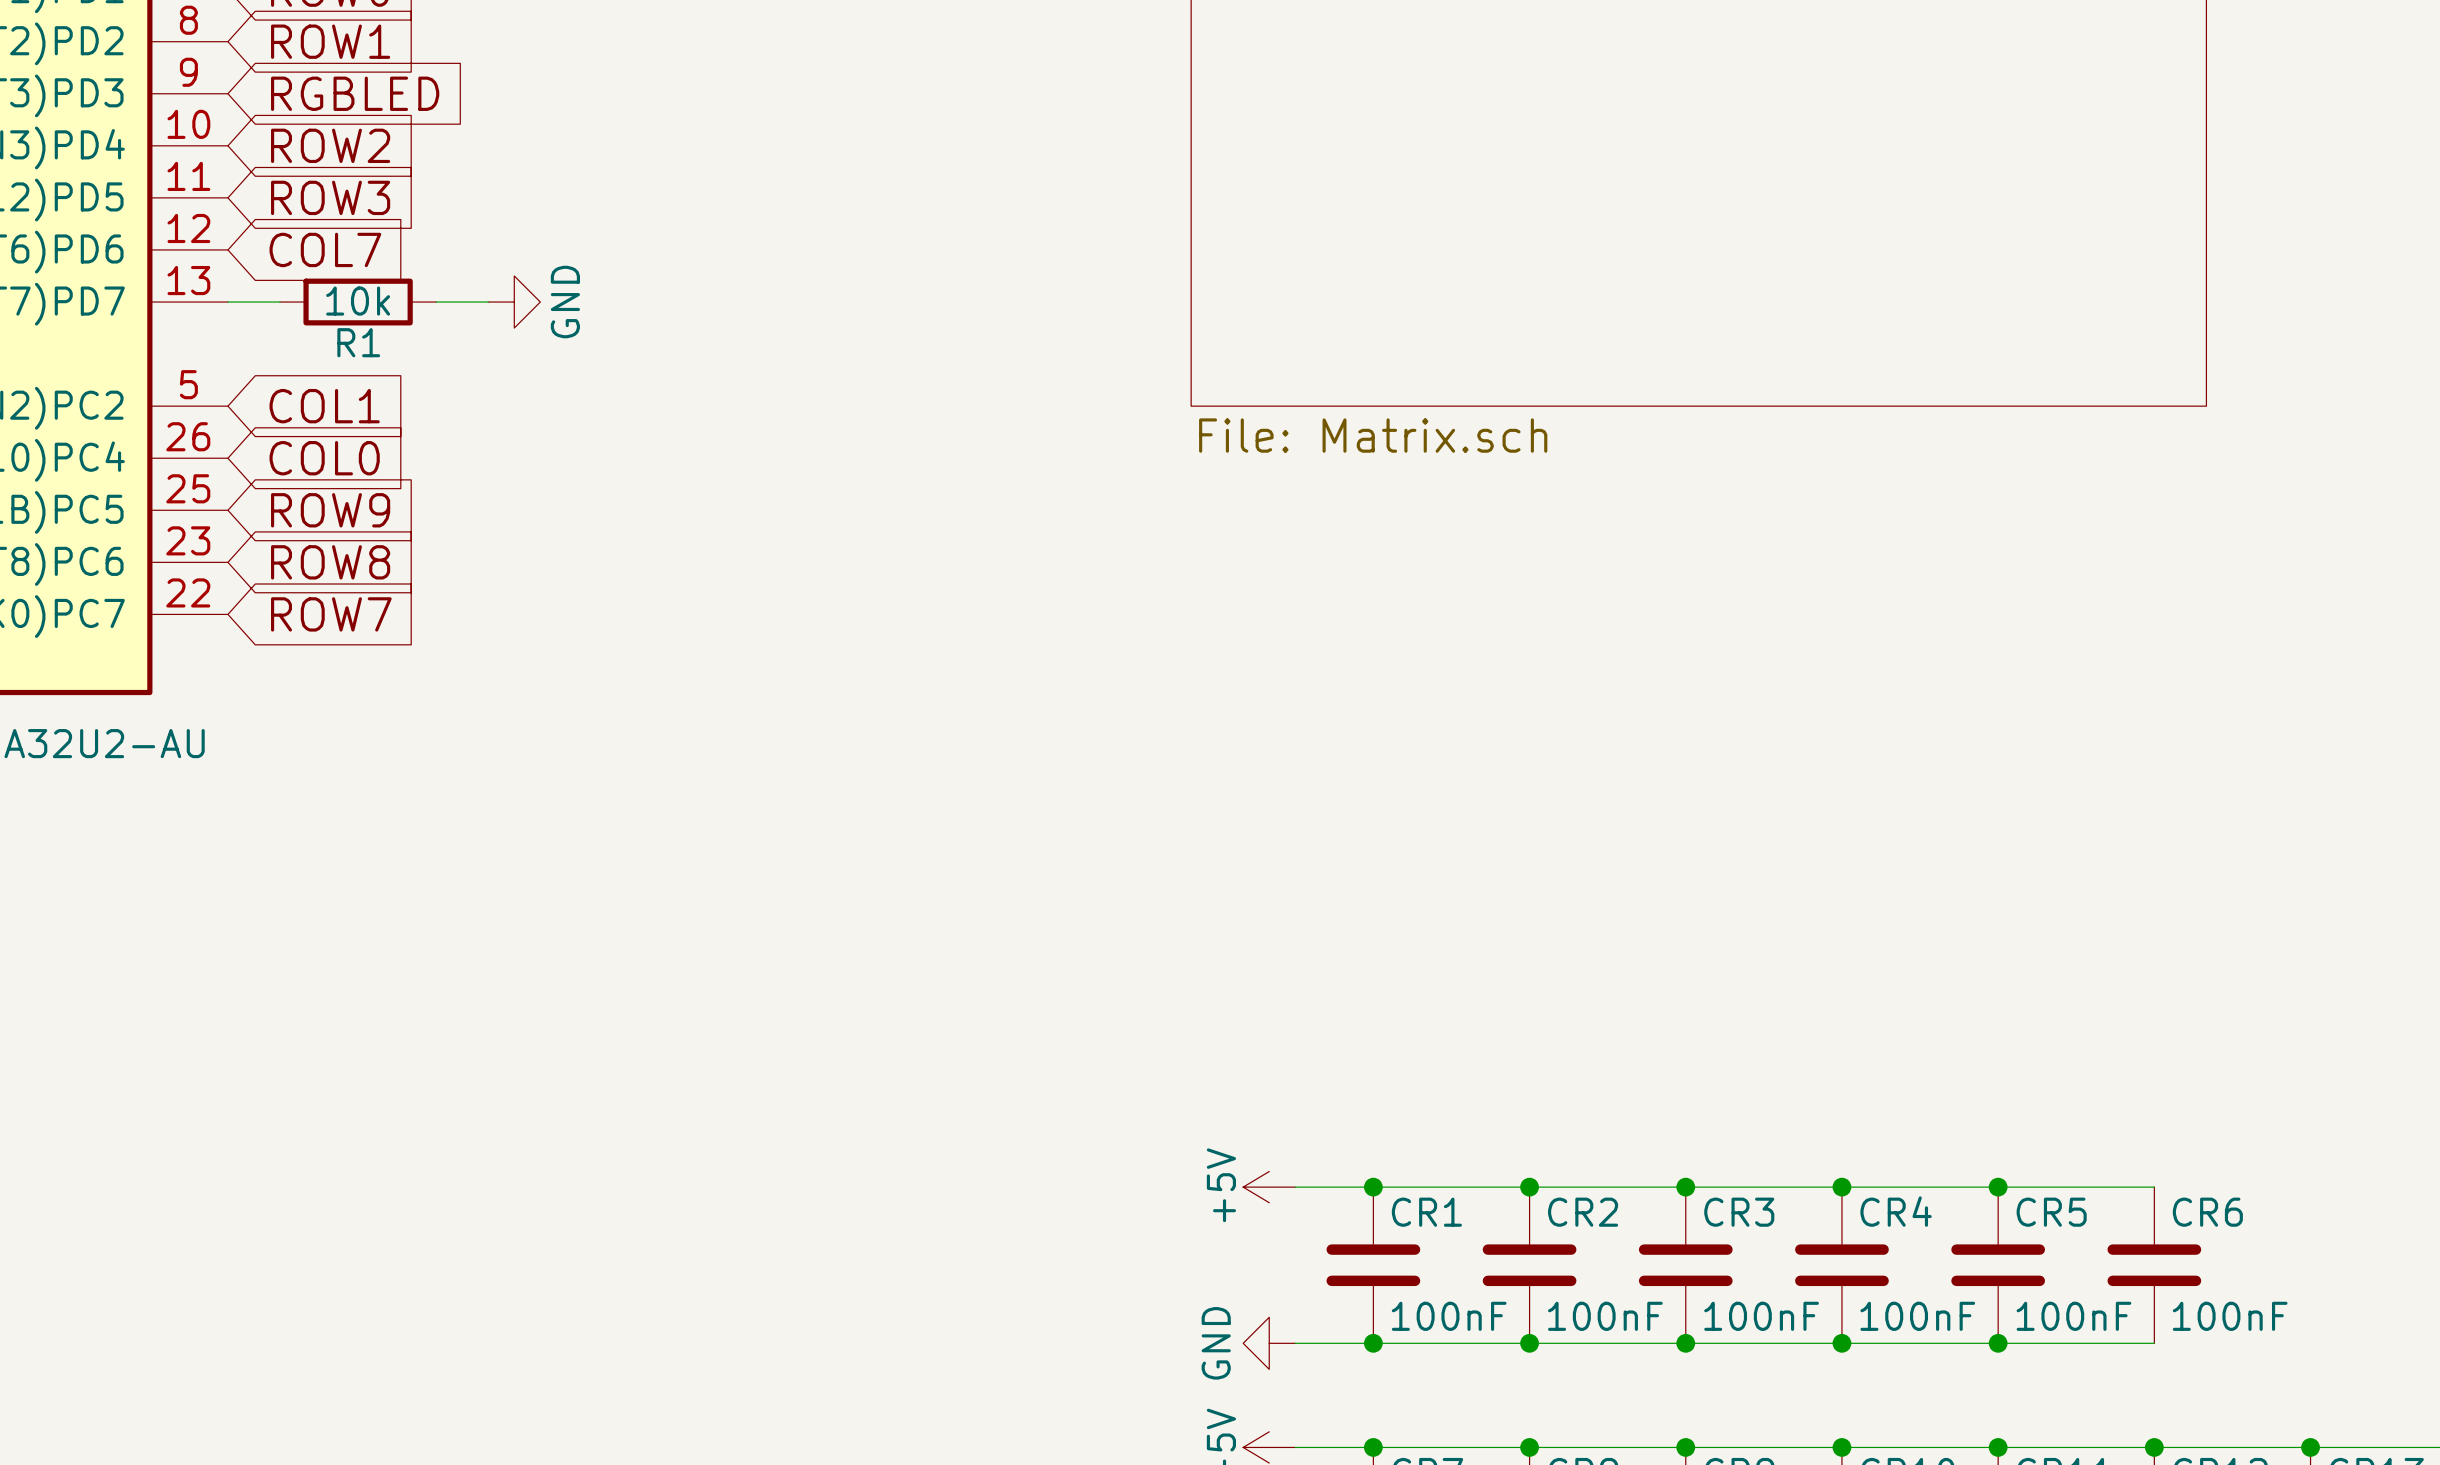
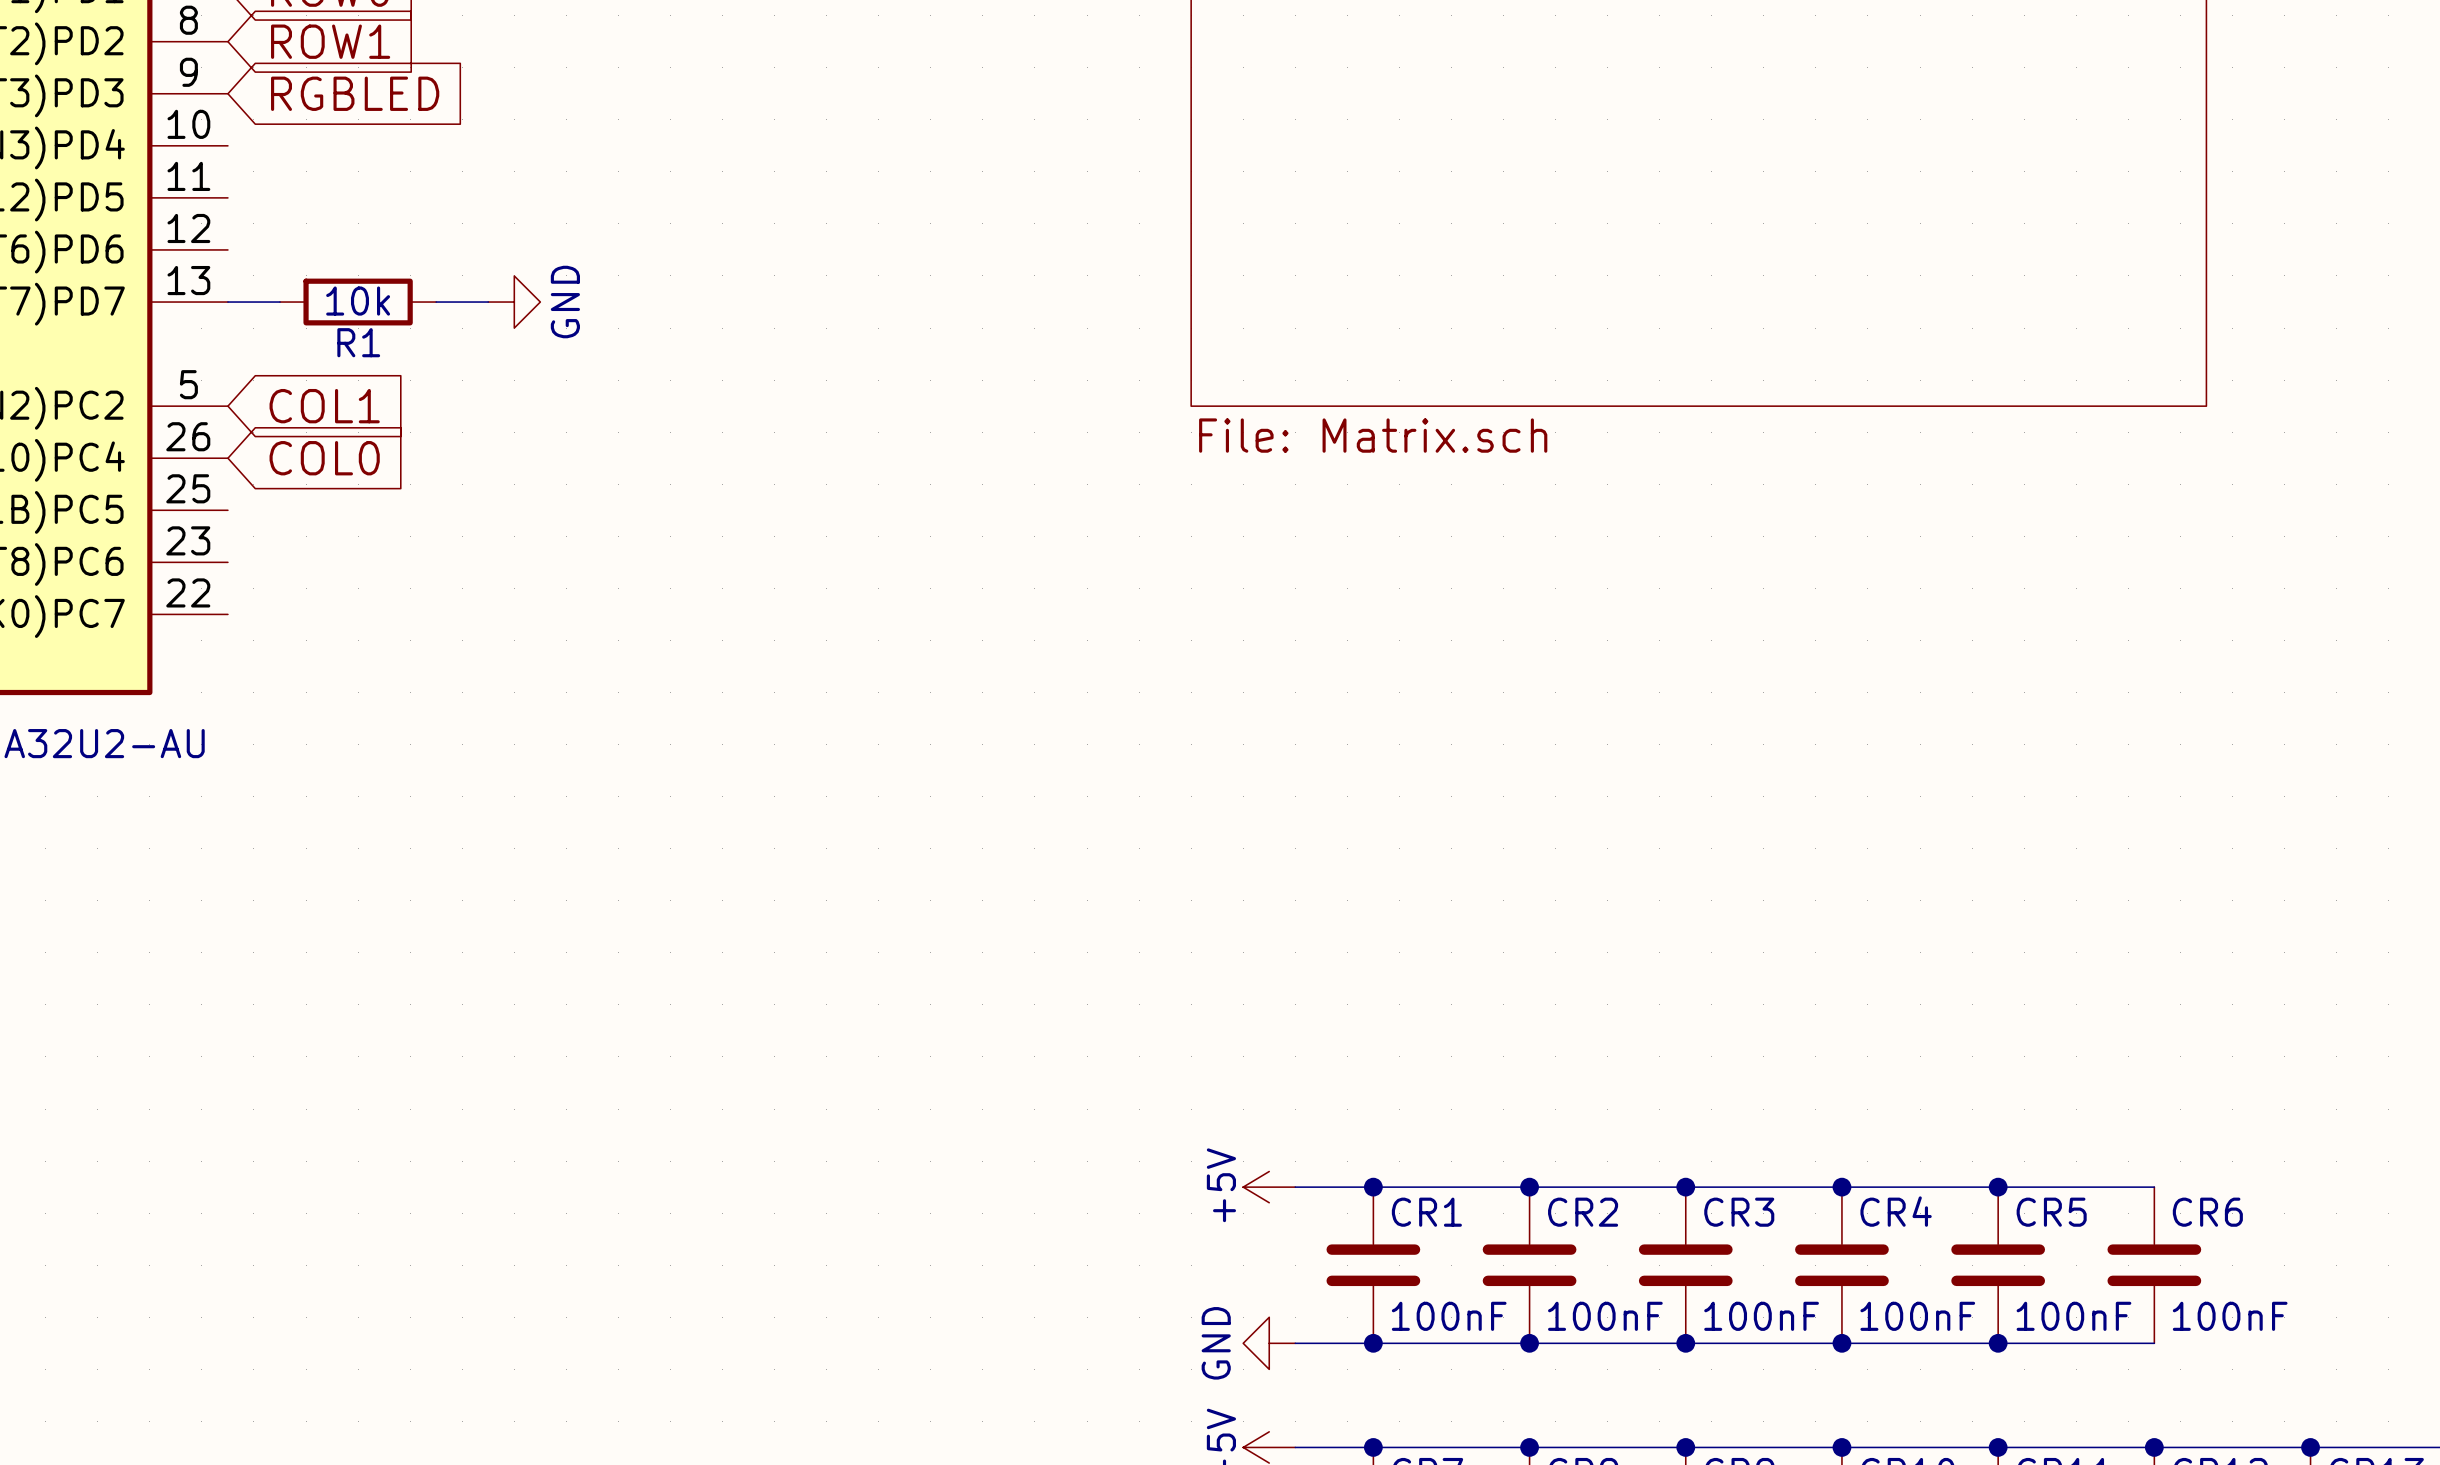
global label: ROW2 (330, 145) -> none
global label: ROW3 (330, 197) -> none
global label: COL7 (325, 249) -> none
global label: ROW9 (330, 510) -> none
global label: ROW8 (330, 562) -> none
global label: ROW7 (331, 614) -> none

